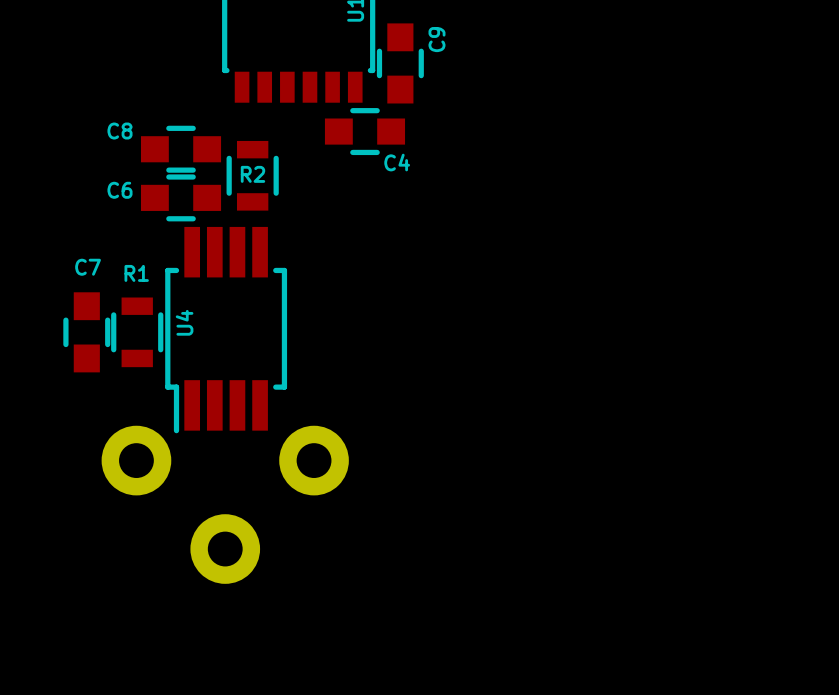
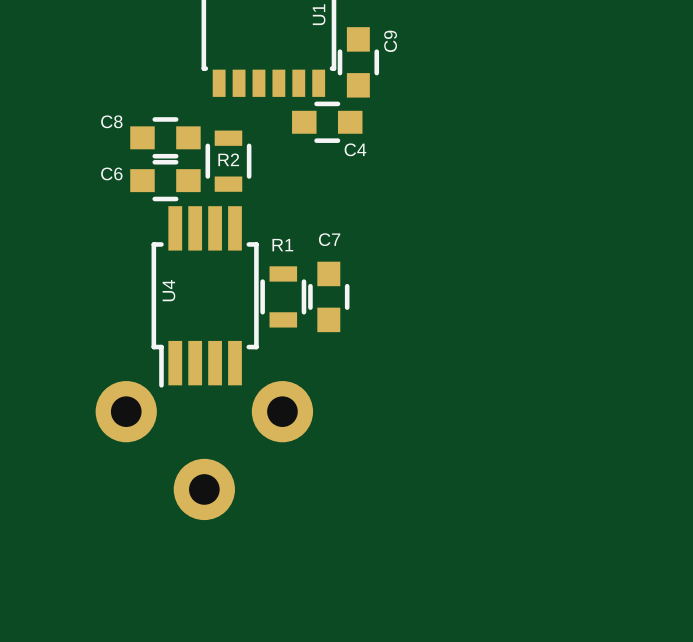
C7 position: (86, 332) -> (328, 296)
R1 position: (137, 332) -> (283, 296)

